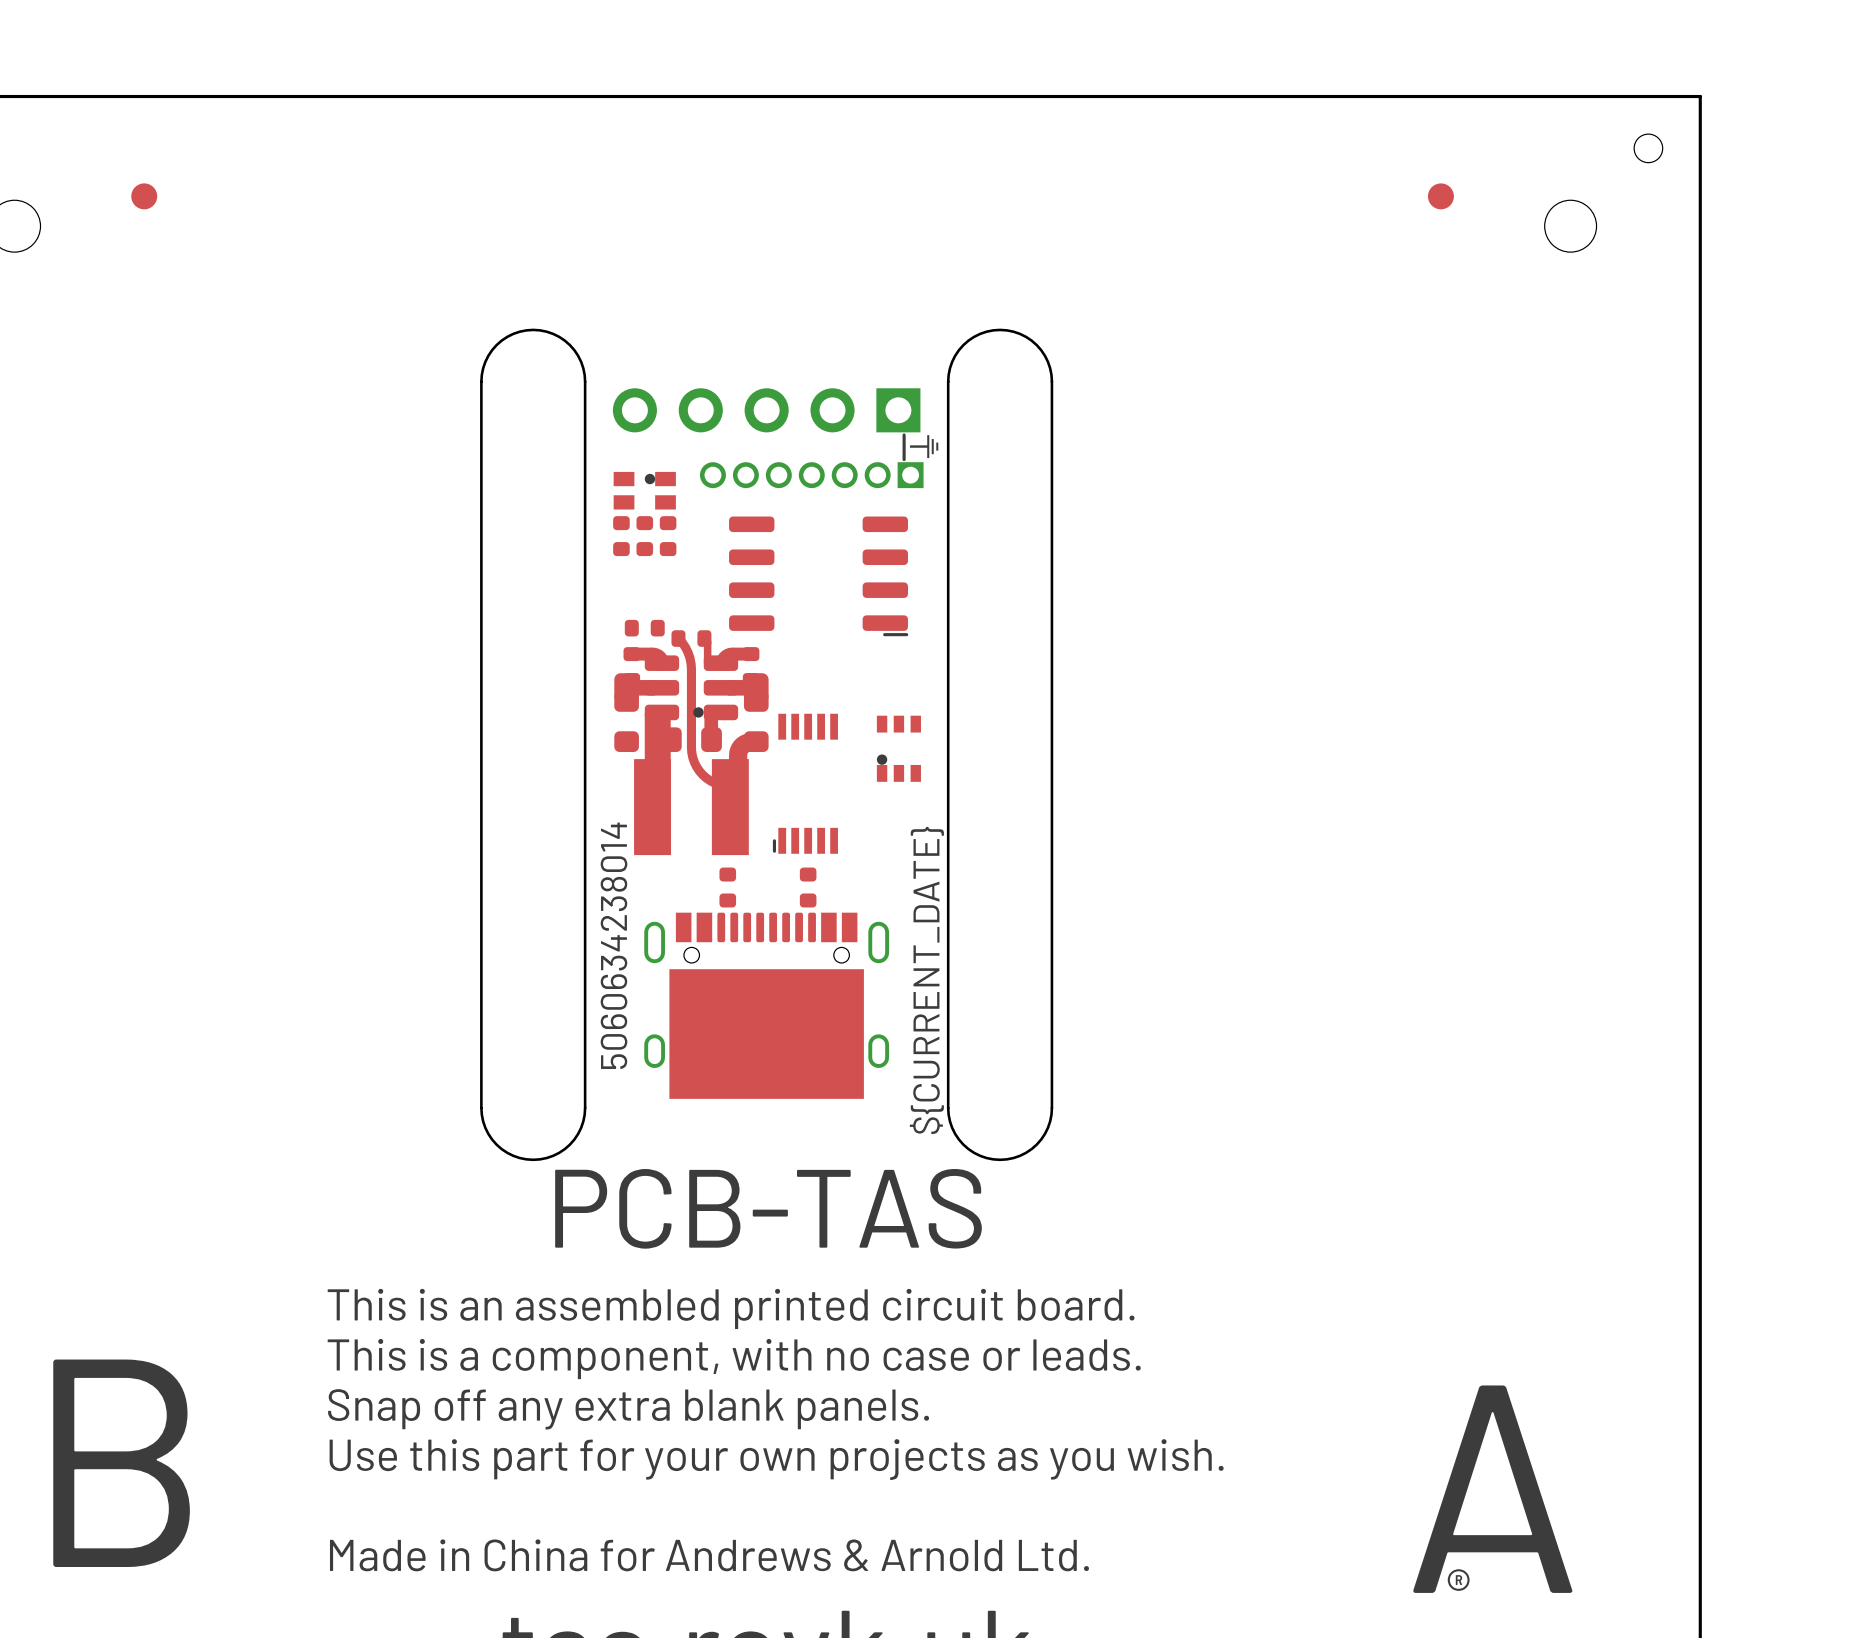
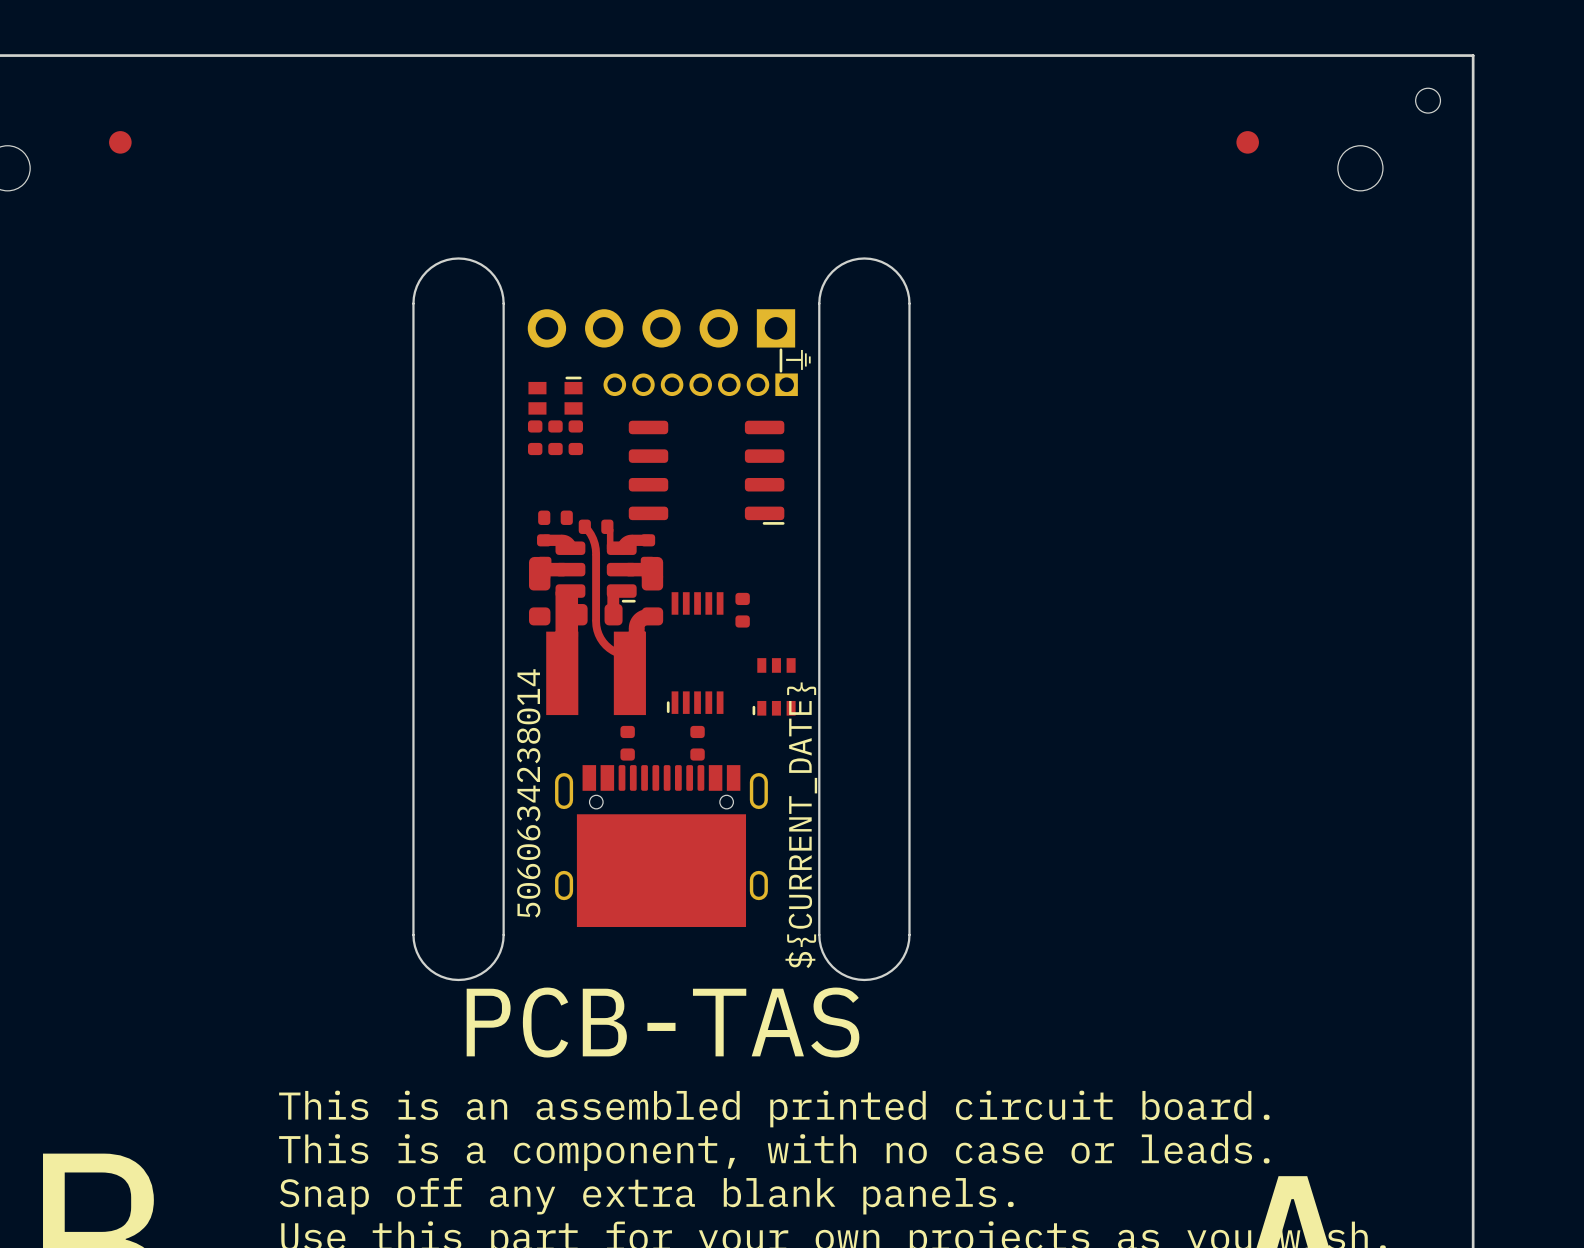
part footprint: [613, 471, 676, 510] -> [528, 376, 583, 415]
part footprint: [614, 630, 769, 856] -> [529, 519, 664, 716]
part: none -> (742, 610)
part: (898, 748) -> none
part: none -> (774, 686)

